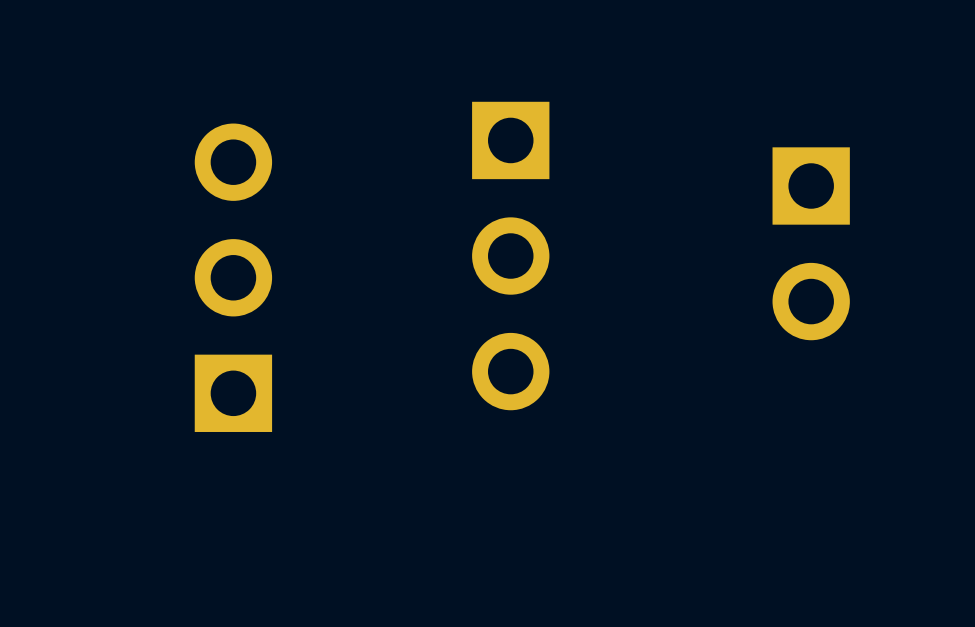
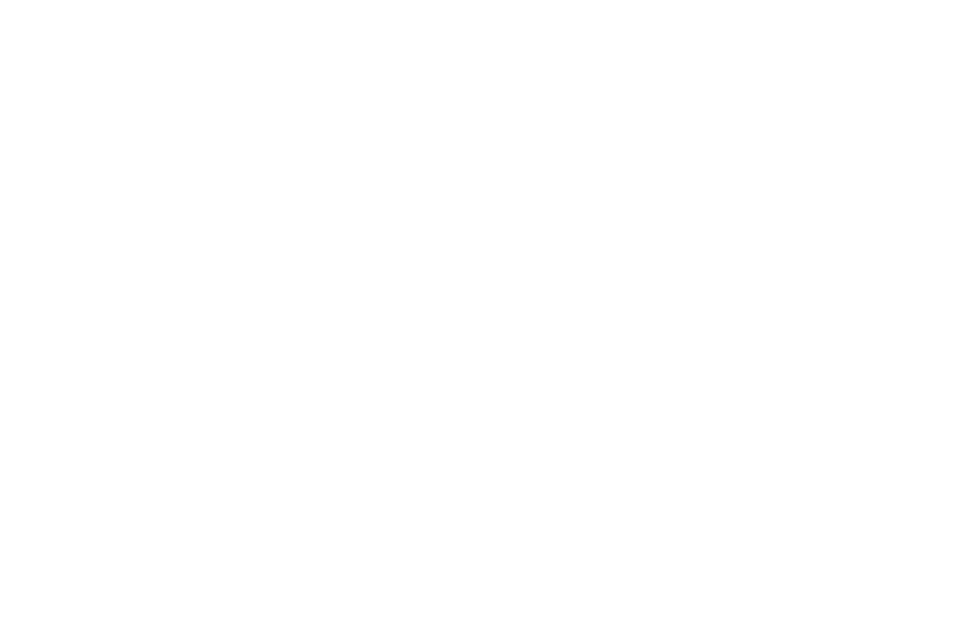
part: (811, 243) -> none
part: (510, 256) -> none
part: (233, 277) -> none

